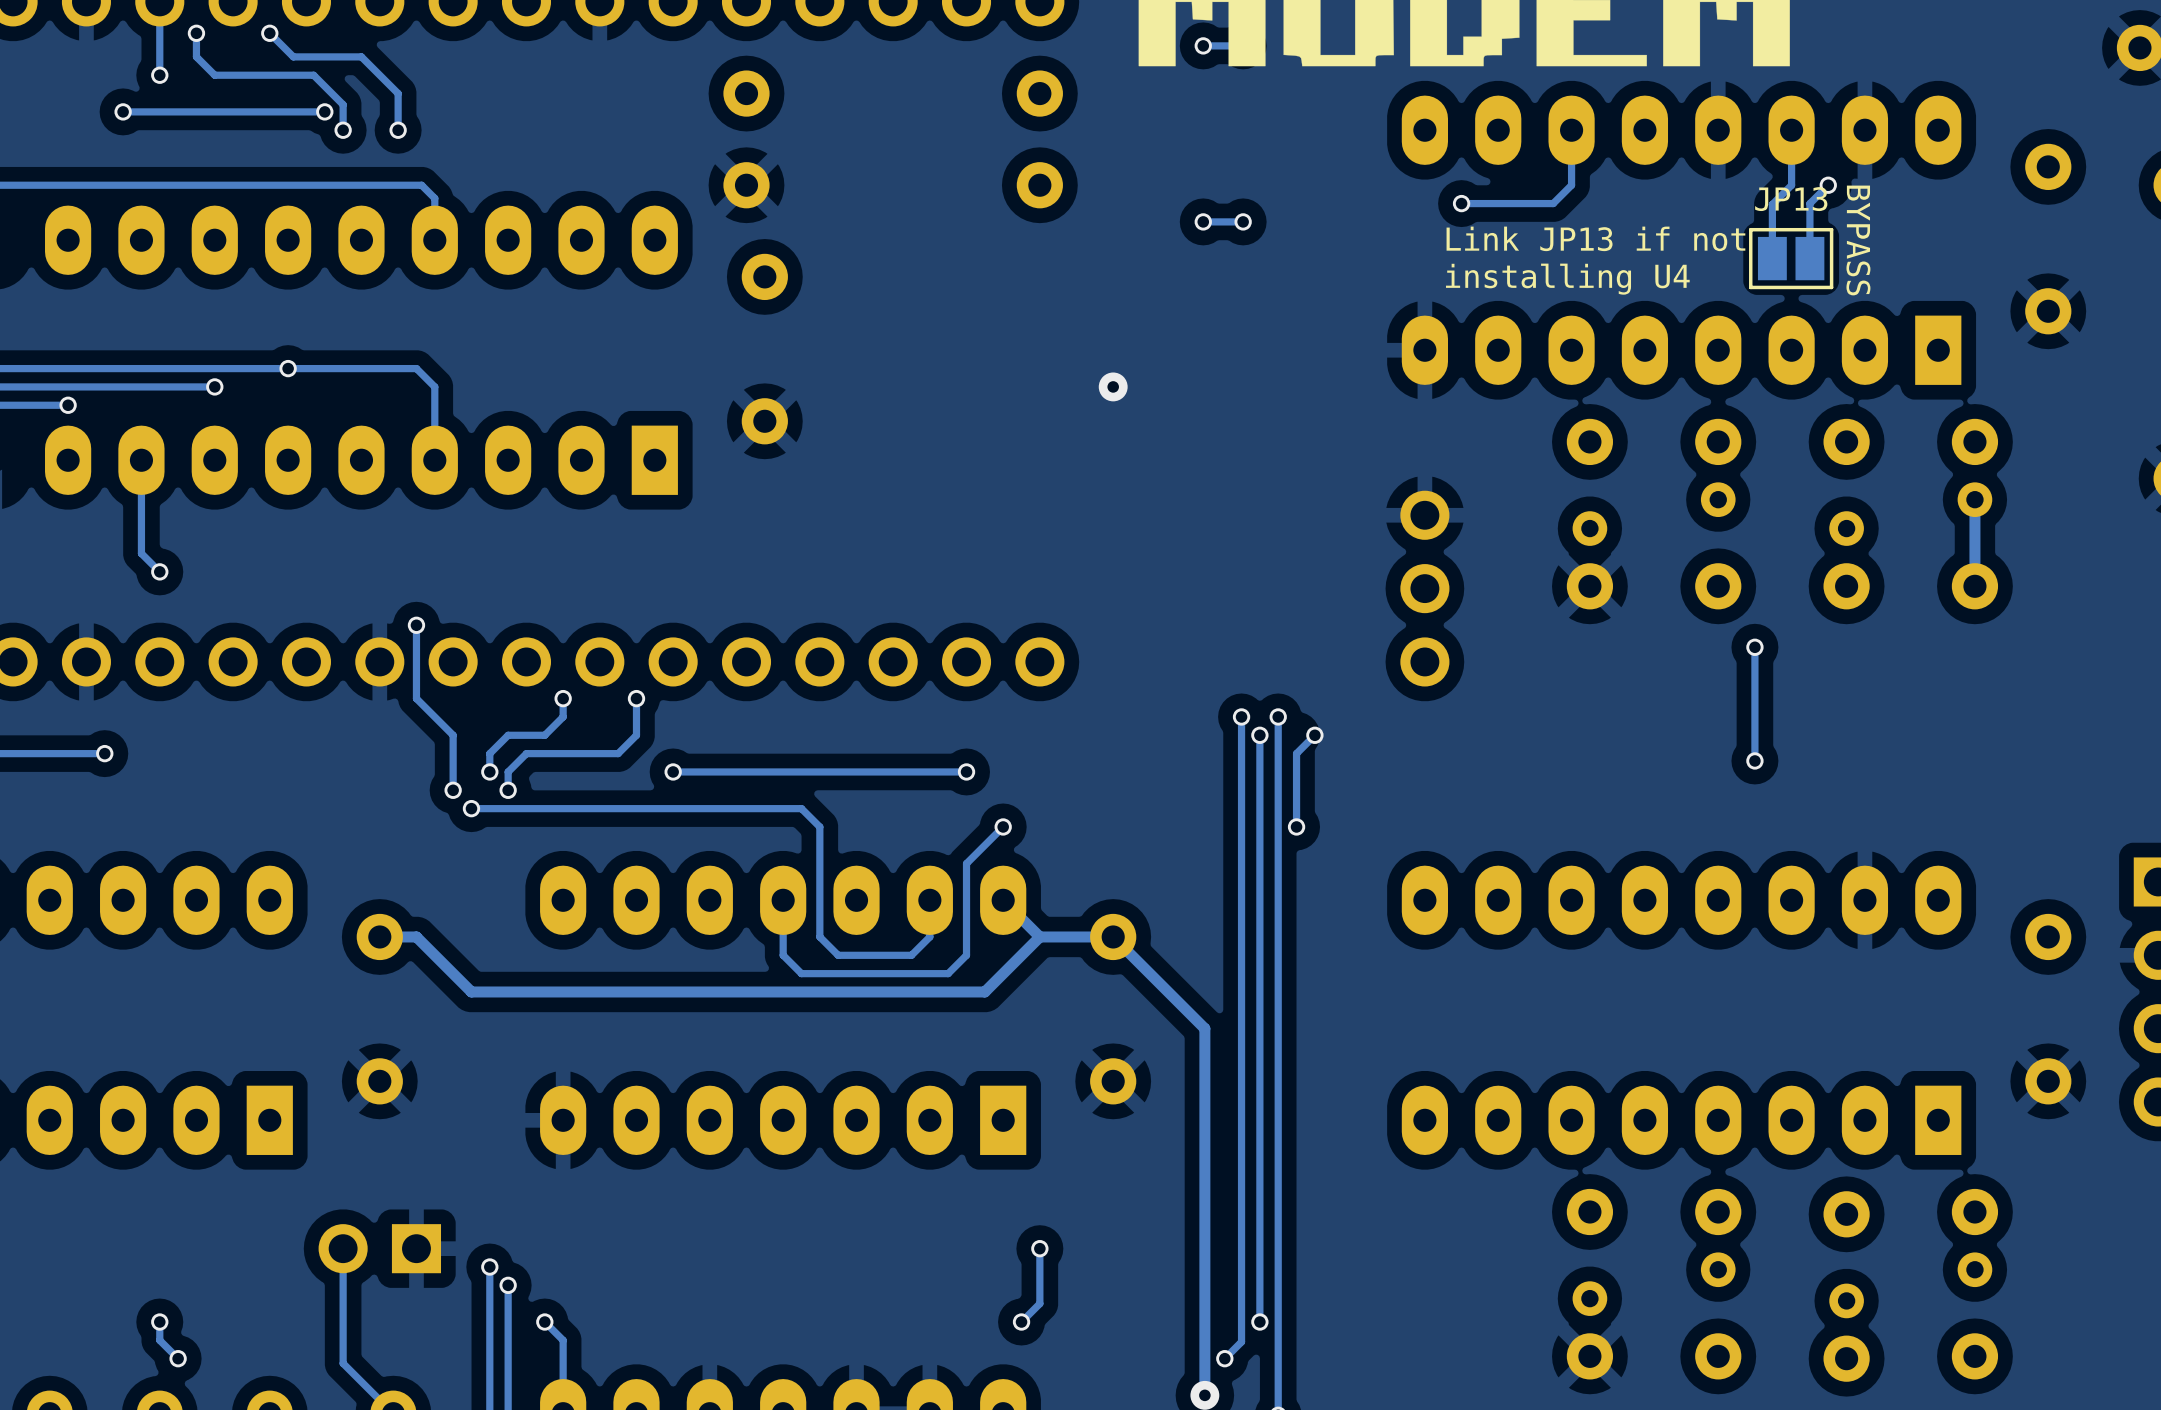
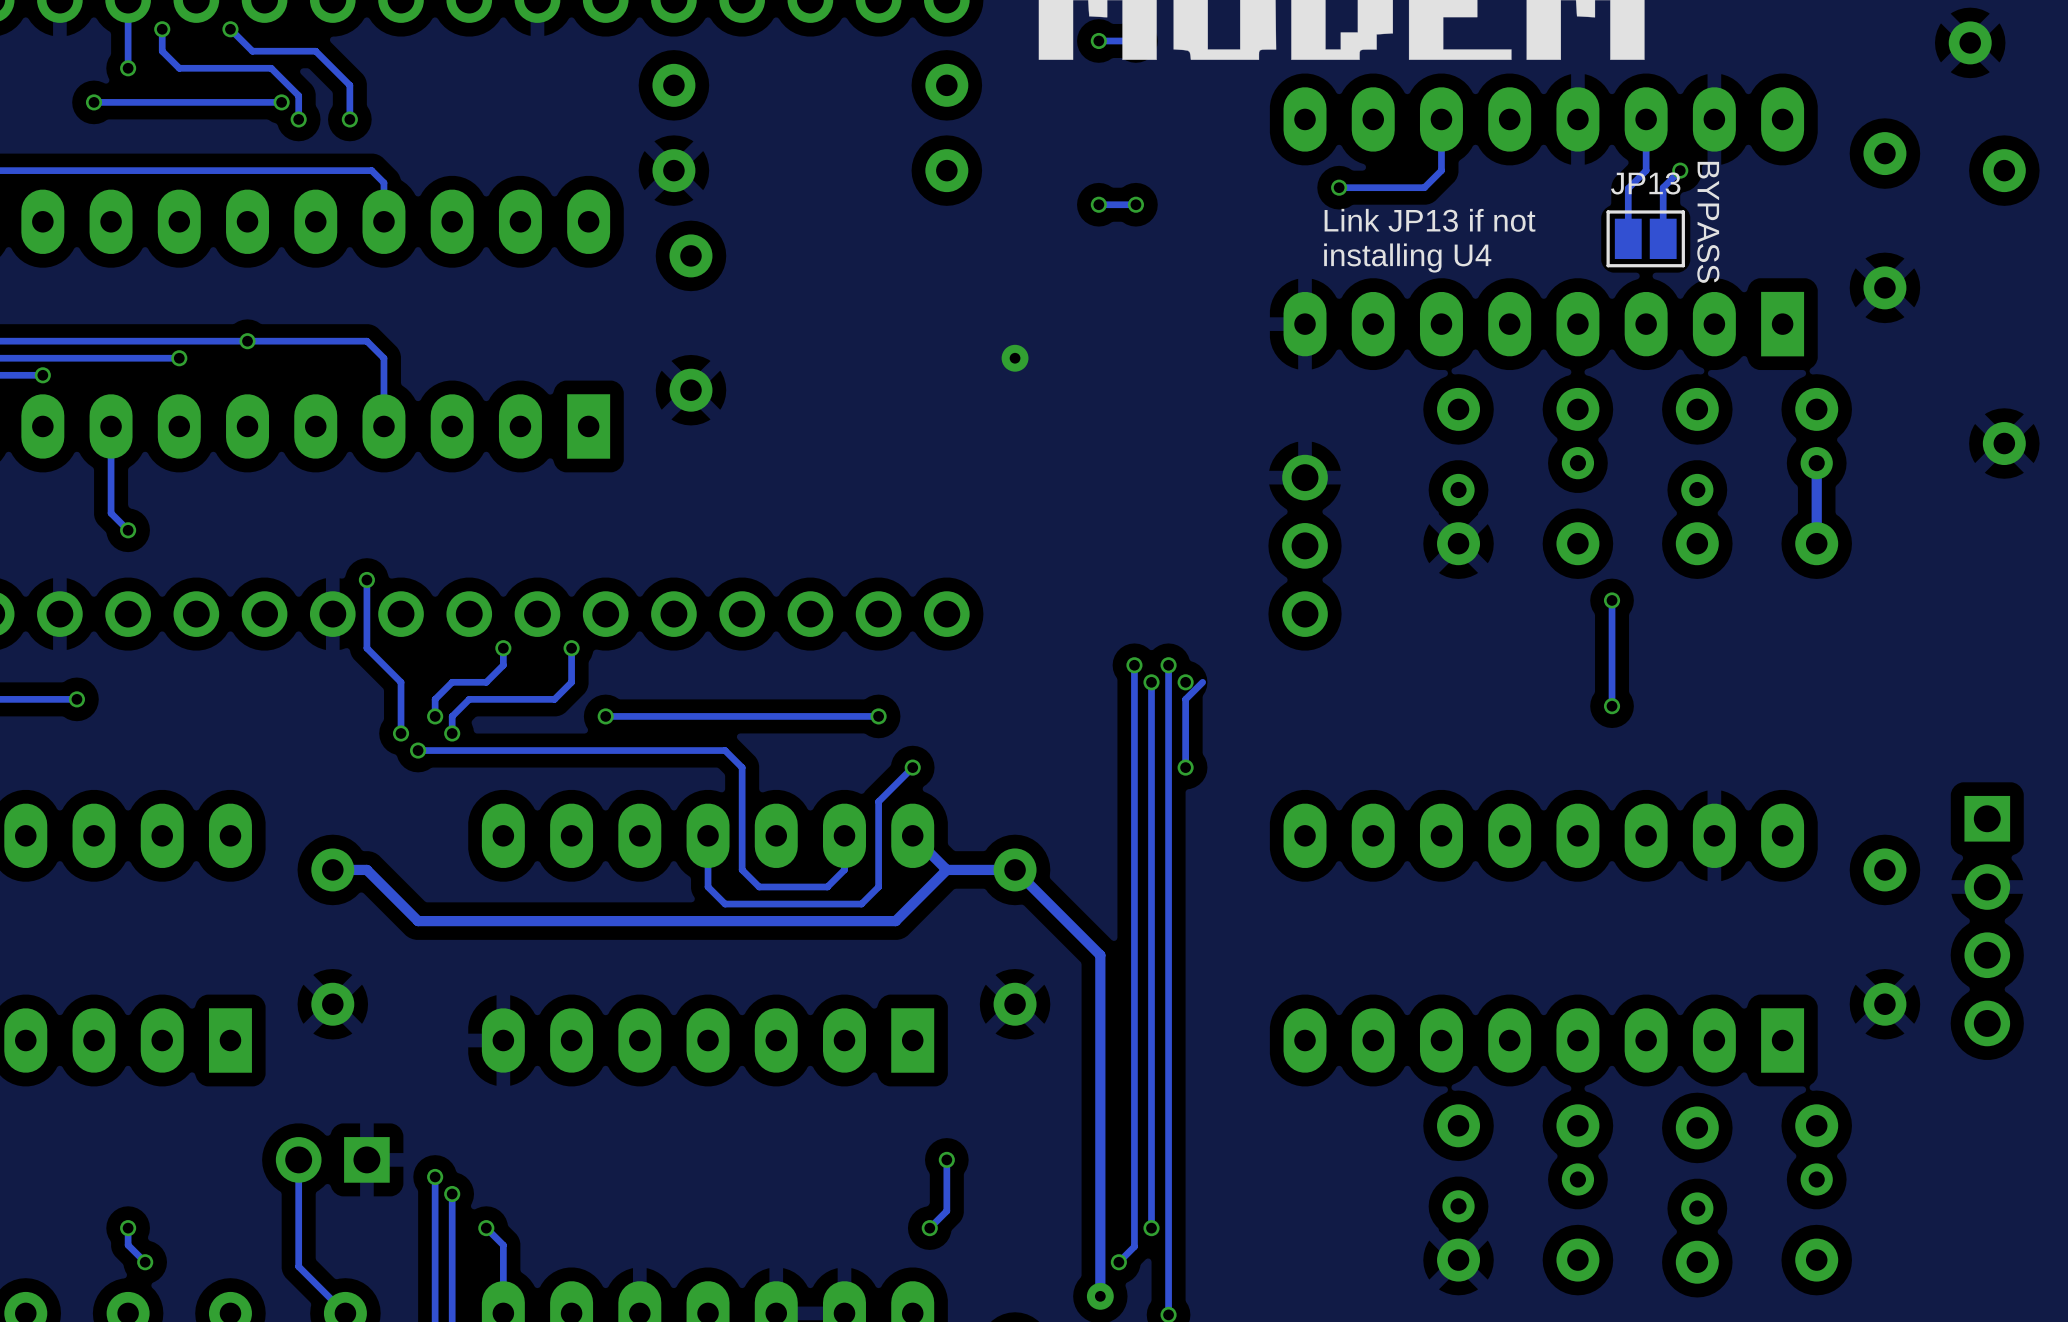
via position: (1314, 735) -> (1185, 682)

